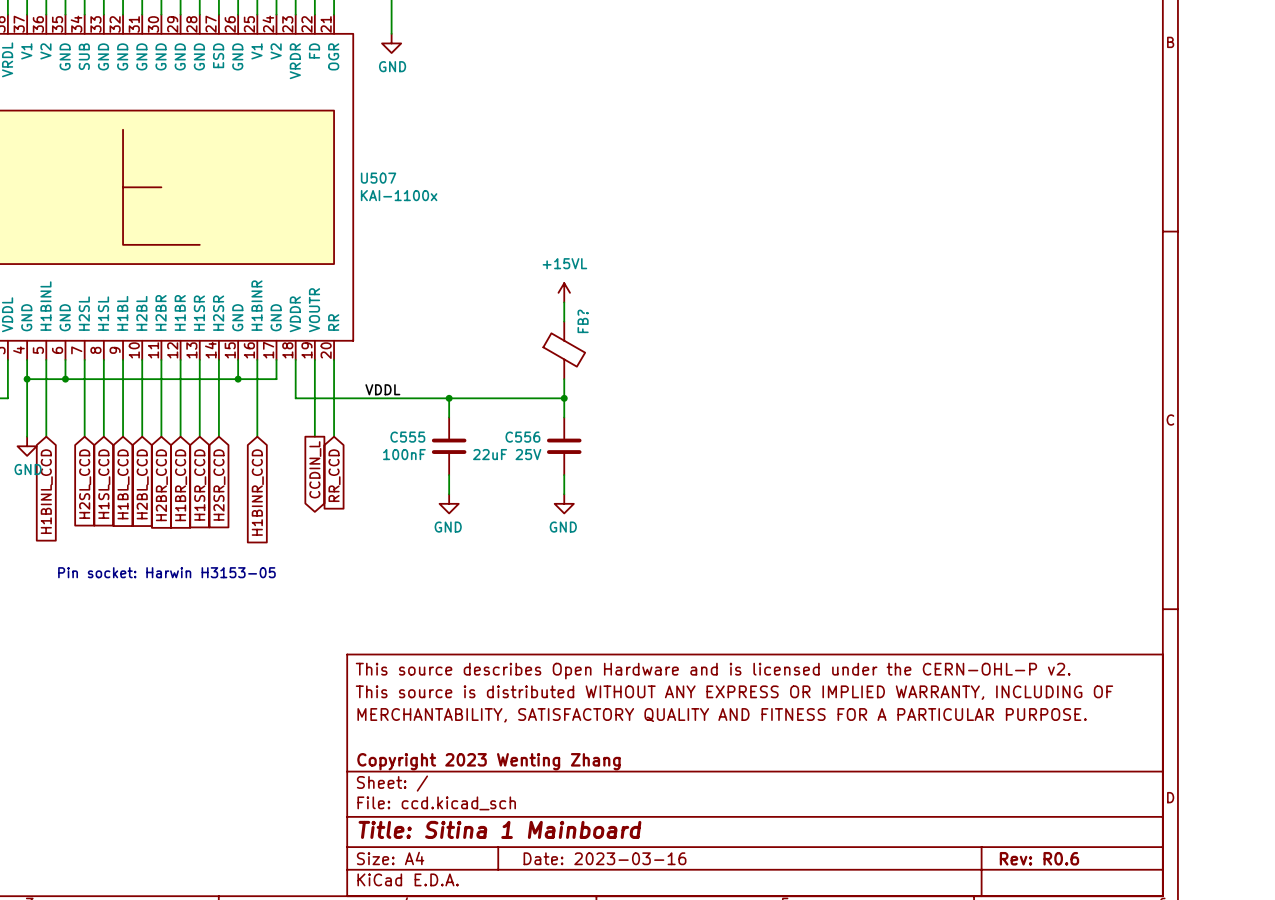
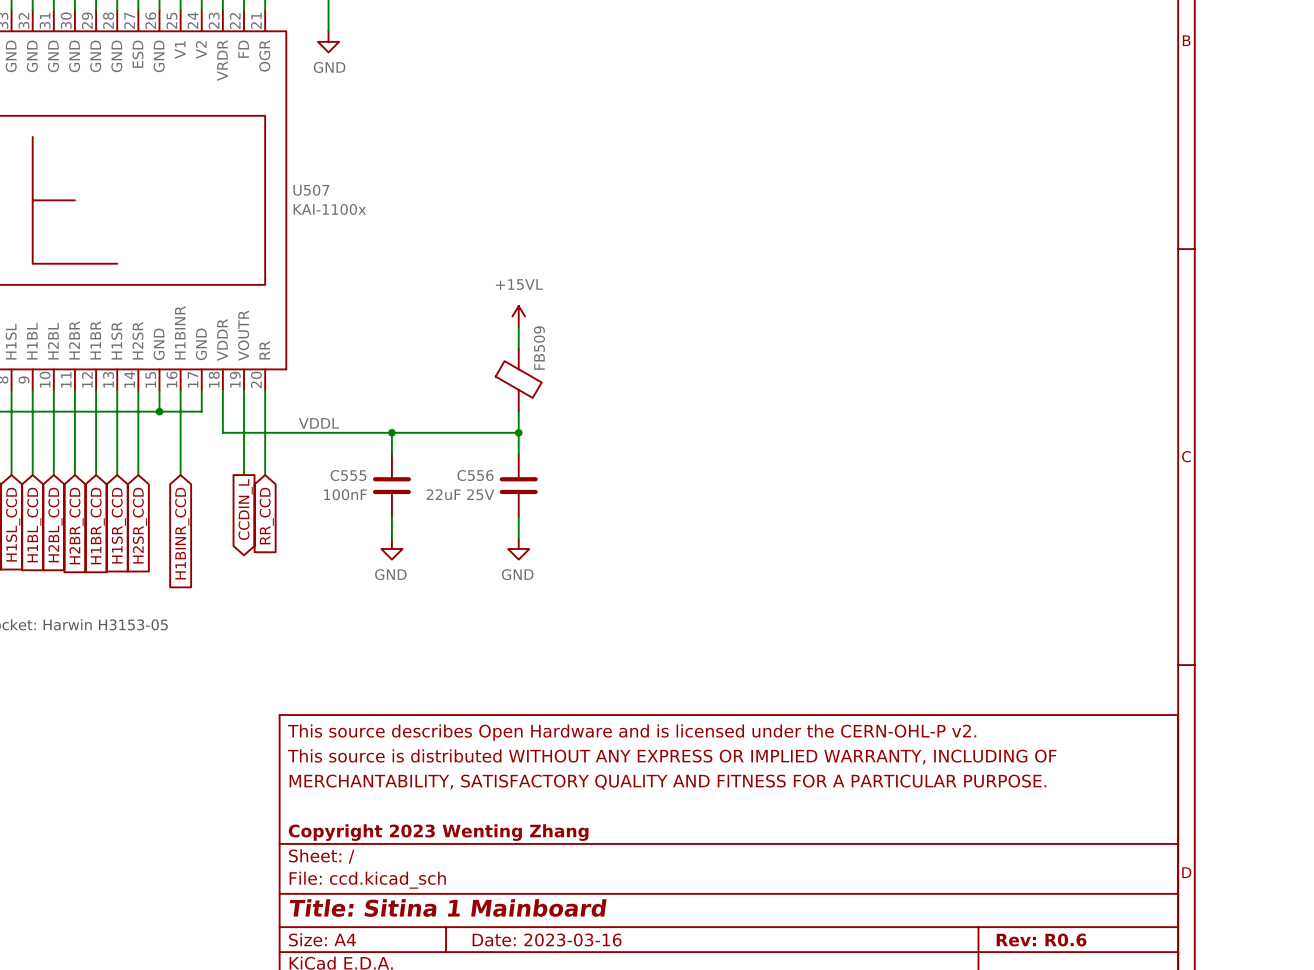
FB? name: FB? (583, 321) -> FB509 (539, 348)

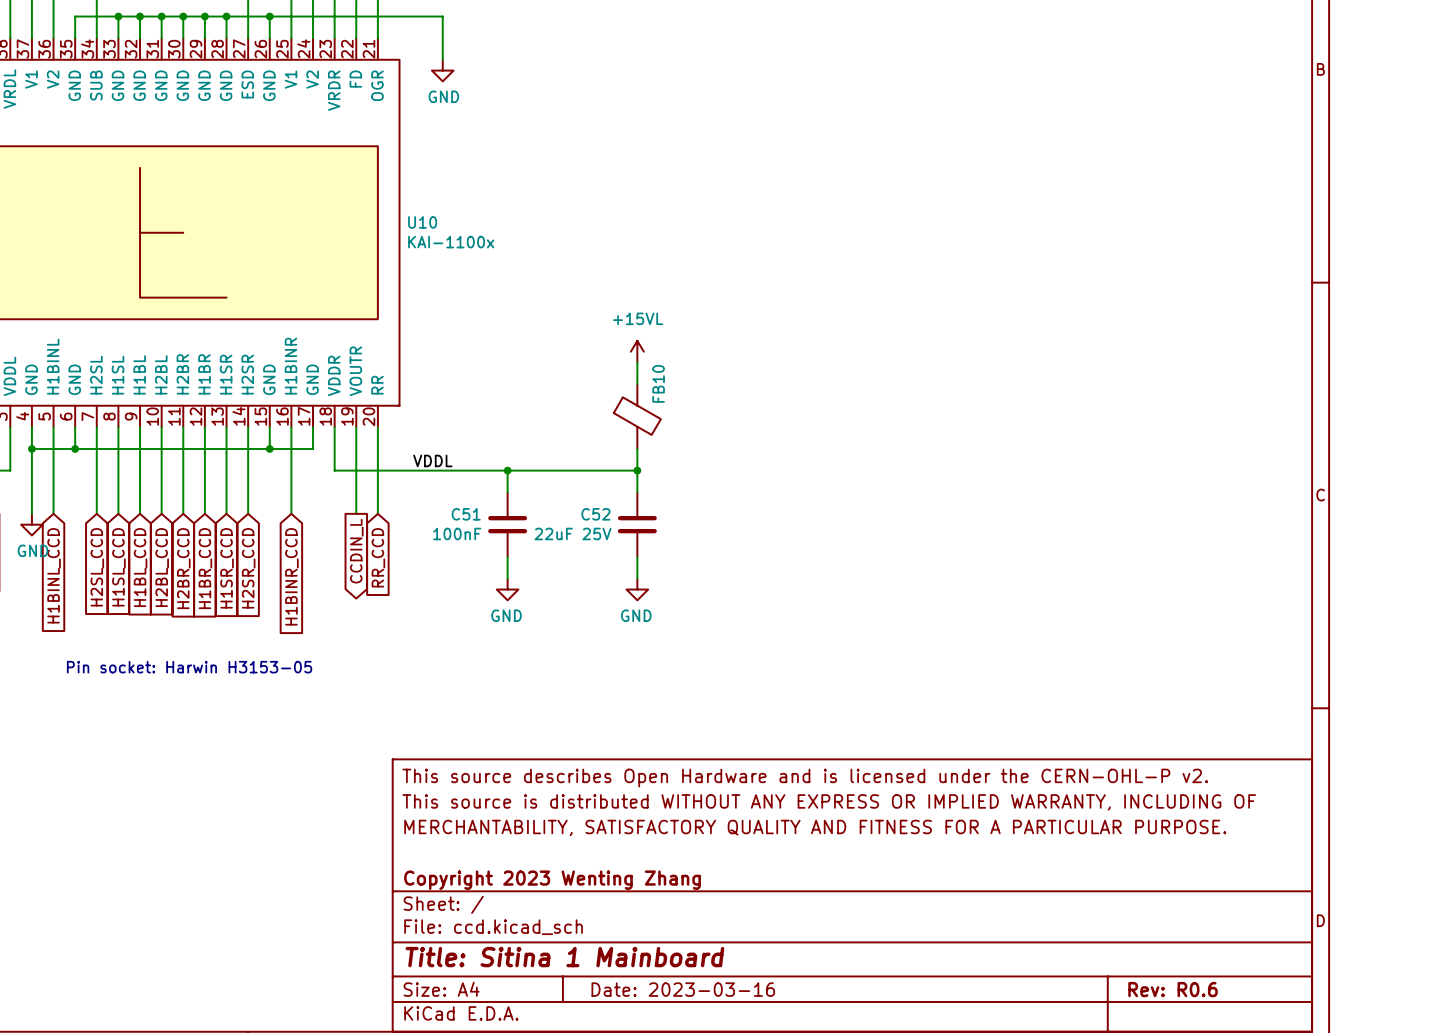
U507 name: U507 (311, 190) -> U10 (422, 222)
FB509 name: FB509 (539, 348) -> FB10 (658, 383)
C555 name: C555 (348, 475) -> C51 (466, 514)
C556 name: C556 (475, 475) -> C52 (595, 514)

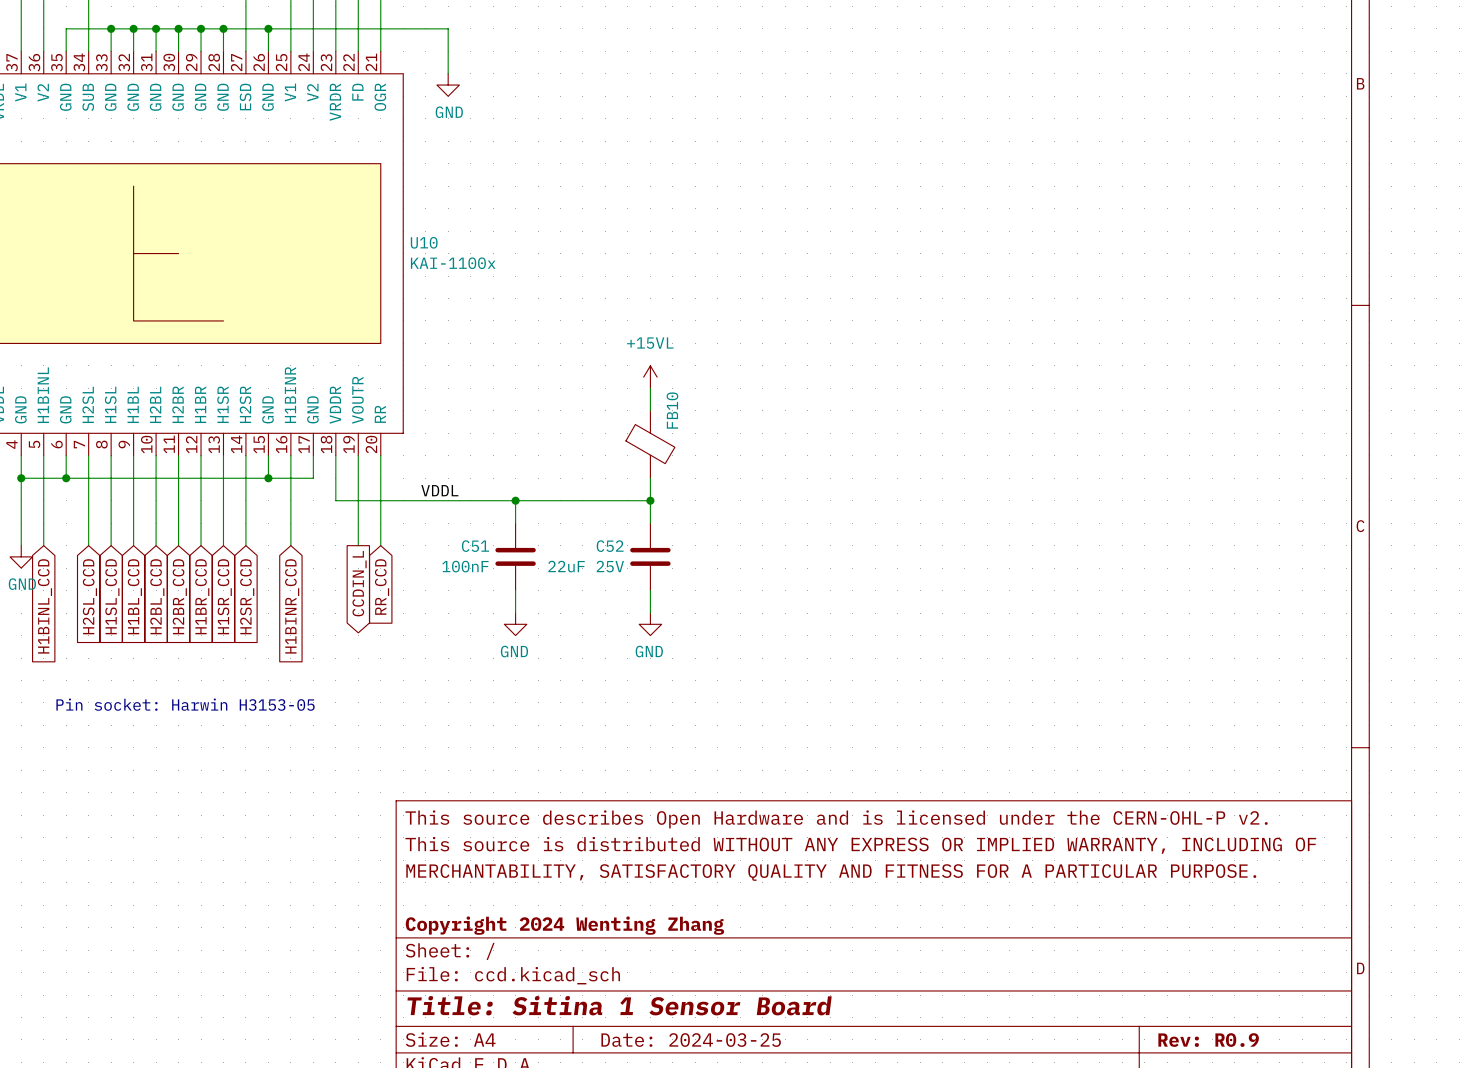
title block: Copyright 2023 Wenting Zhang (552, 880) -> Copyright 2024 Wenting Zhang (564, 925)
title block: Title: Sitina 1 Mainboard (564, 957) -> Title: Sitina 1 Sensor Board (619, 1005)
title block: Date: 2023-03-16 (683, 989) -> Date: 2024-03-25 (691, 1040)
title block: Rev: R0.6 (1173, 989) -> Rev: R0.9 (1208, 1040)

